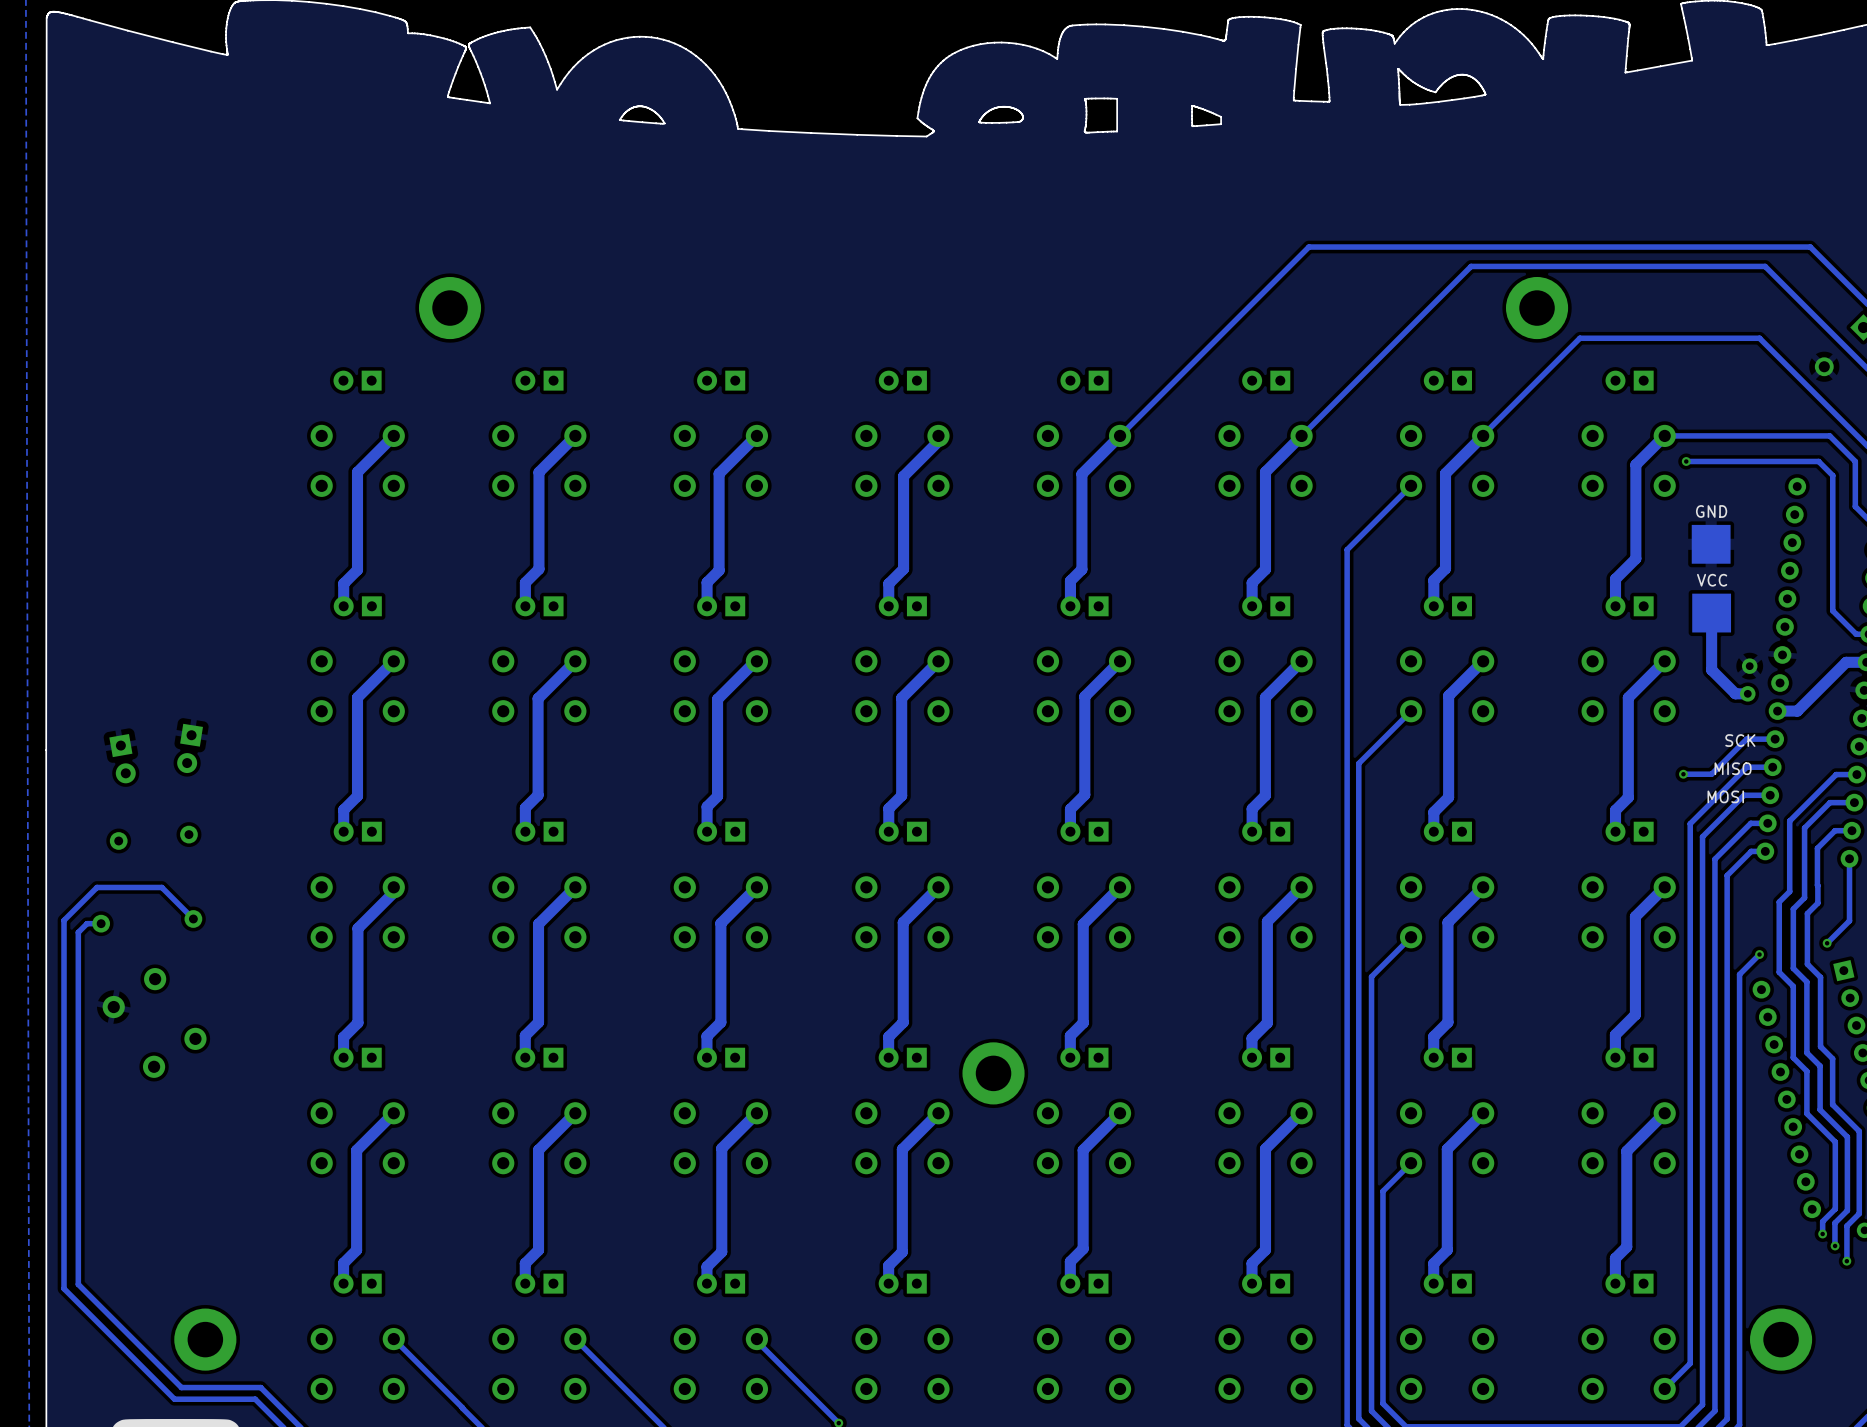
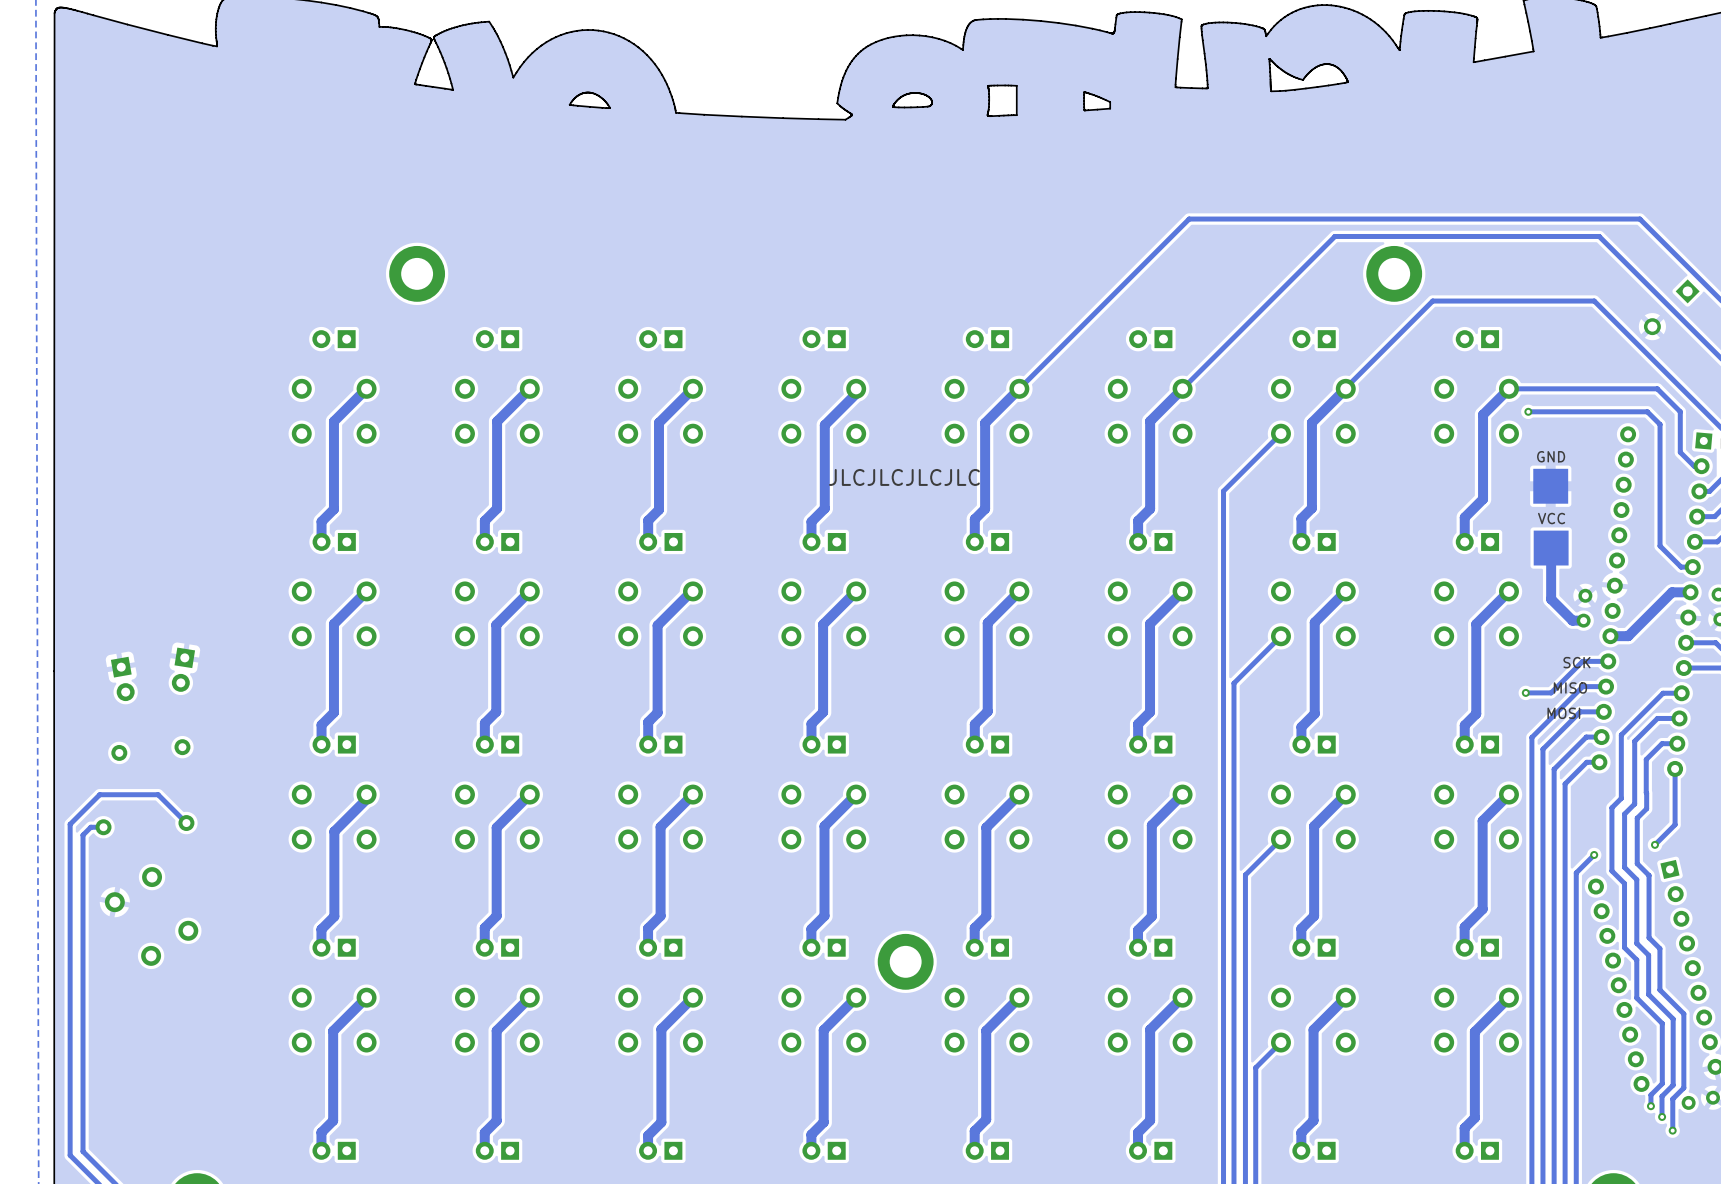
text: none -> JLCJLCJLCJLC (904, 477)

